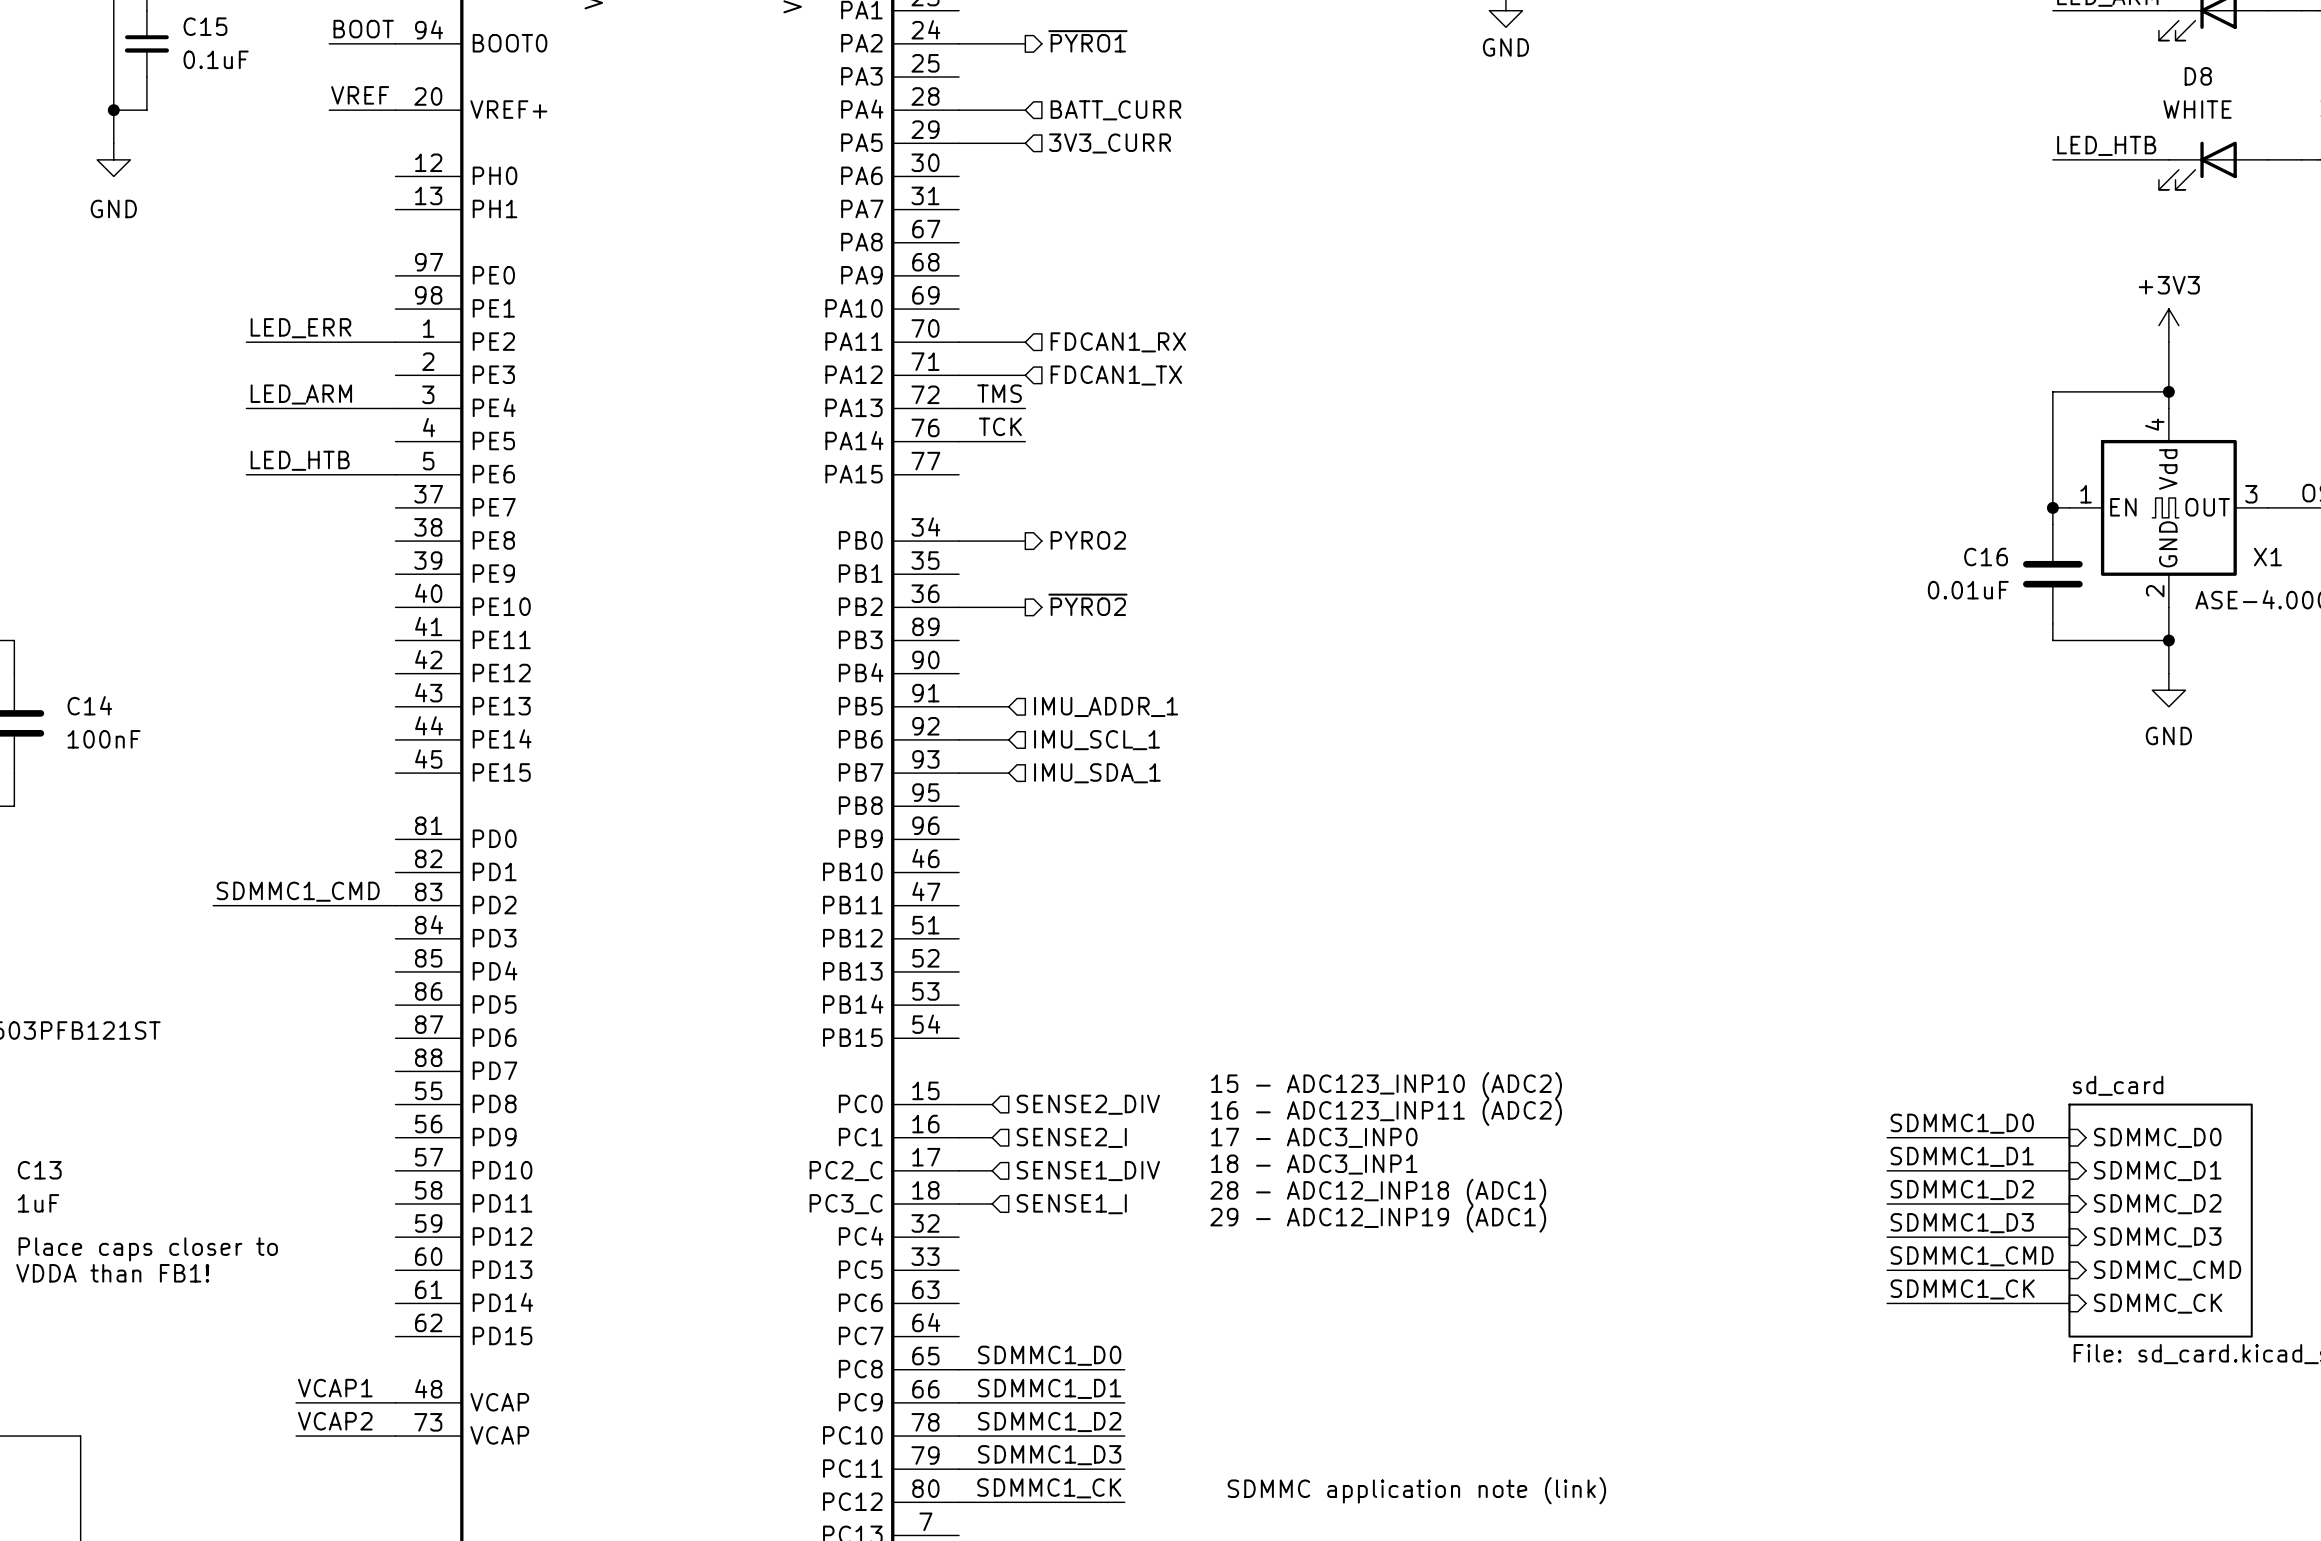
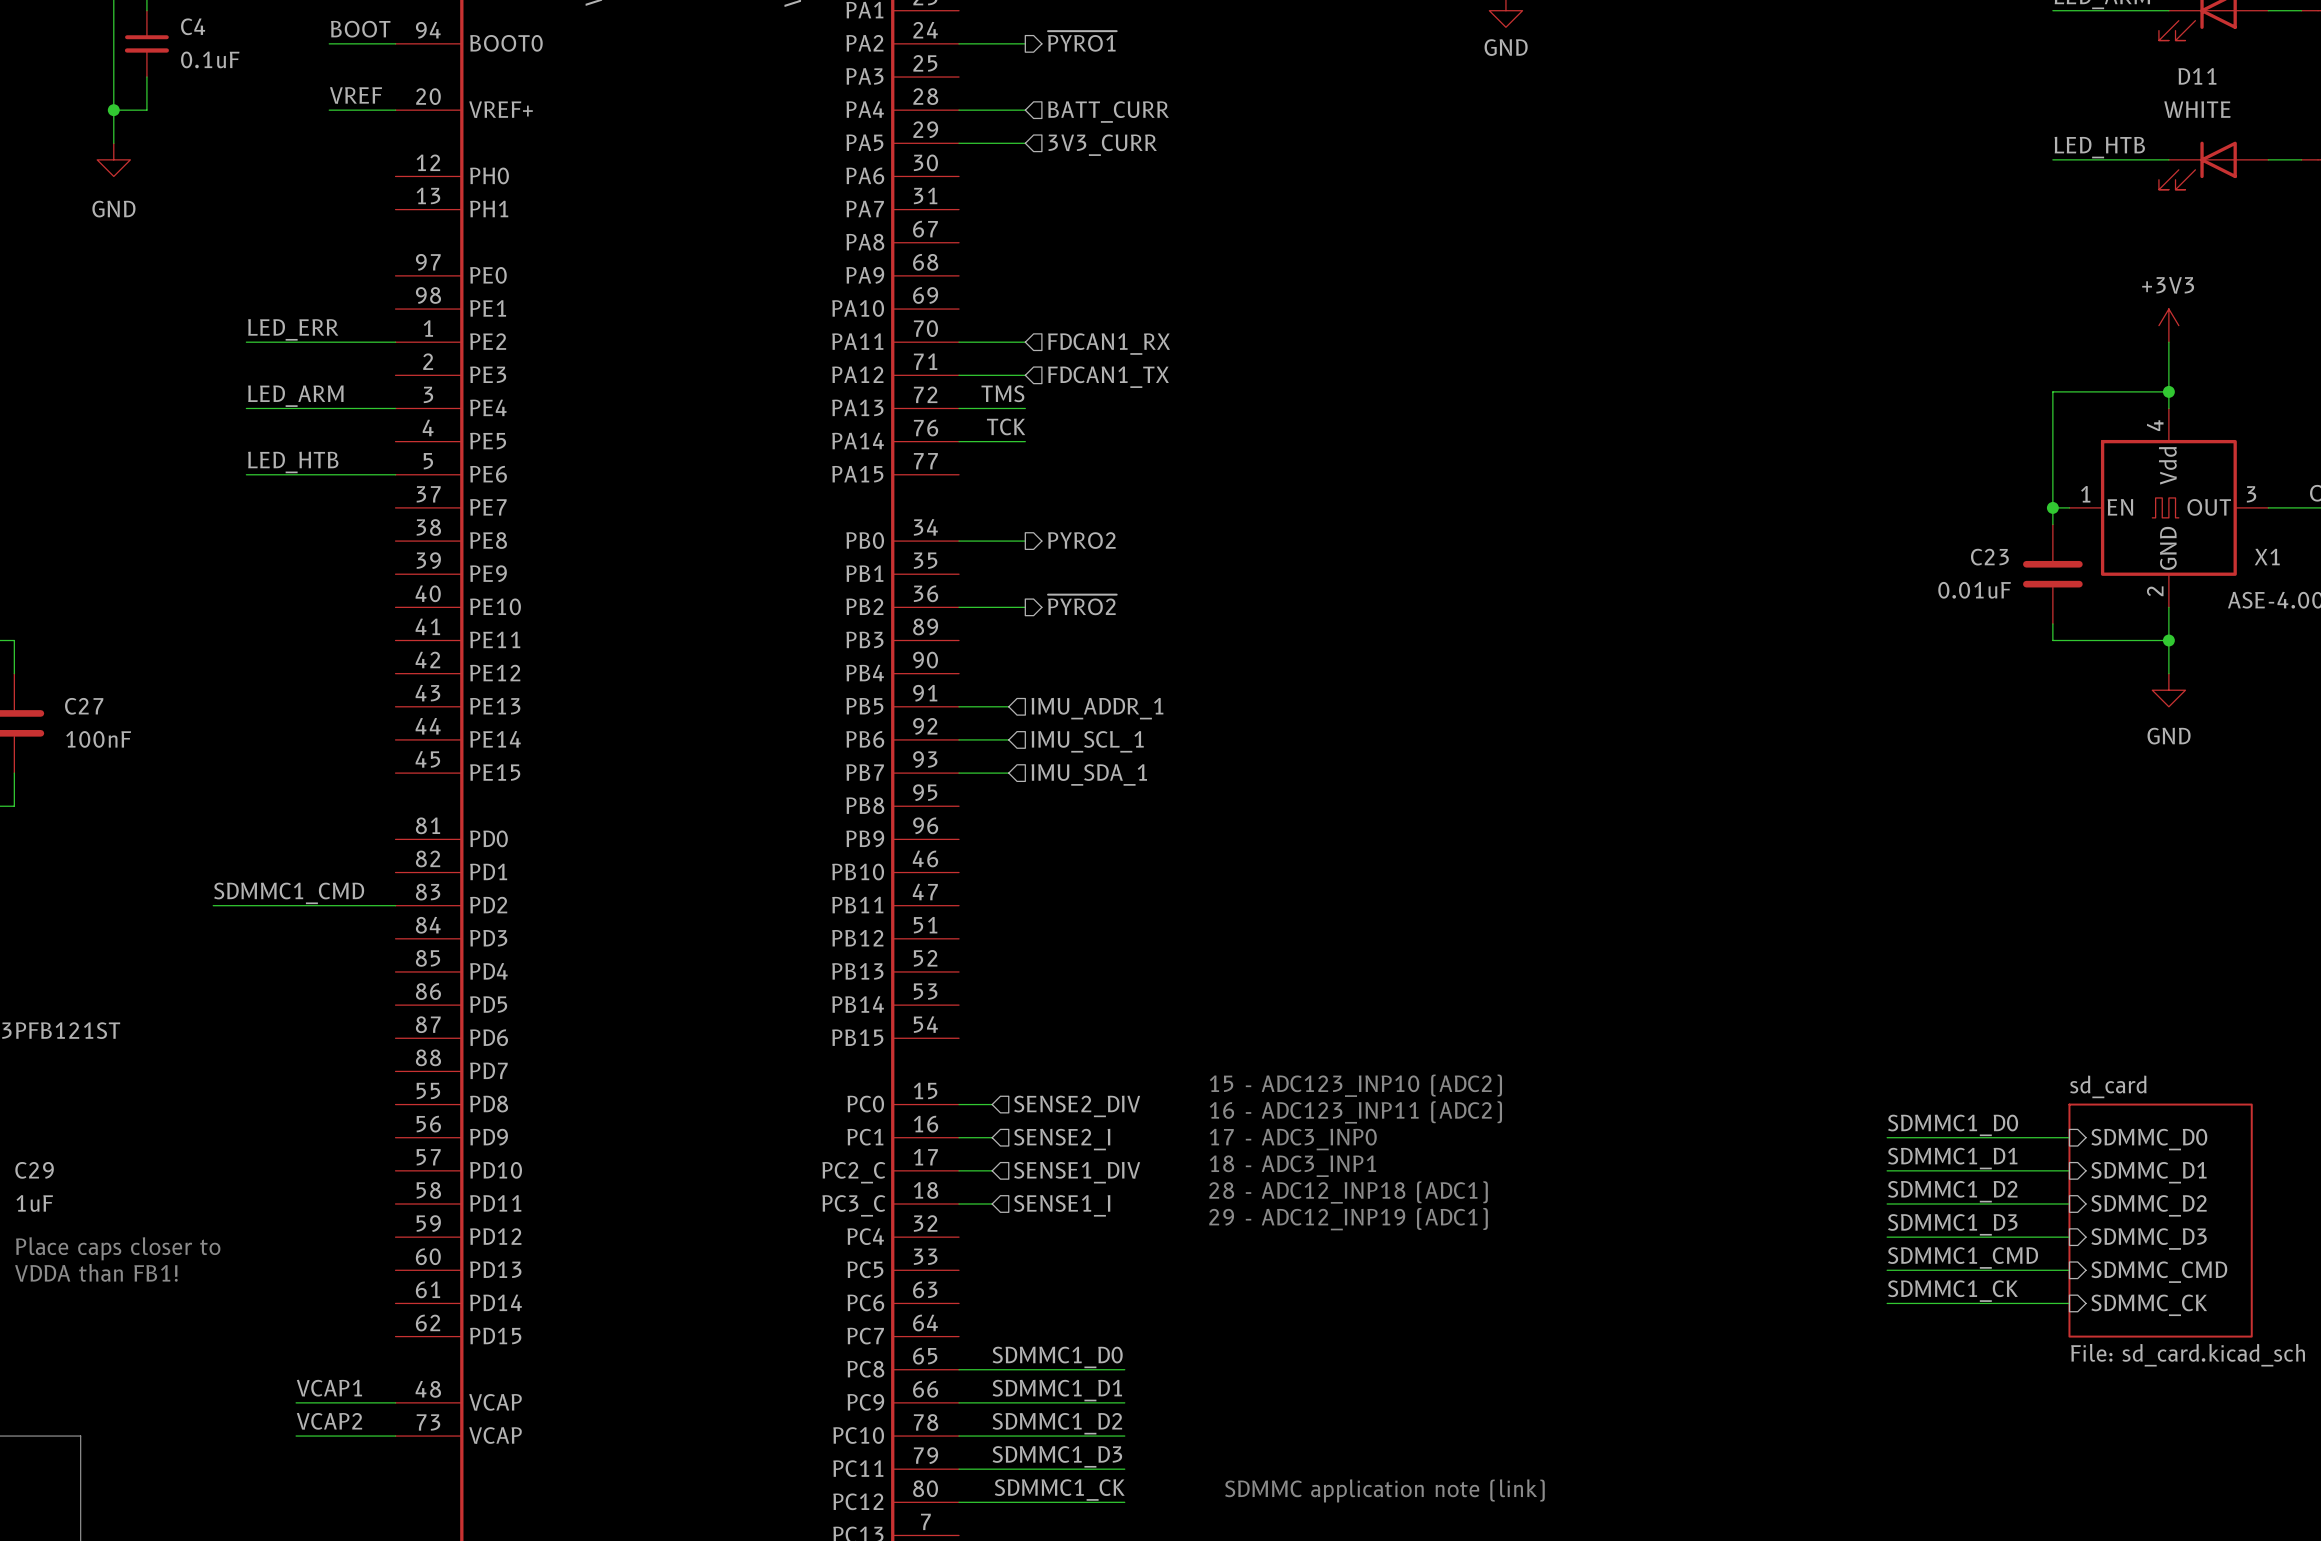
C15 name: C15 (205, 26) -> C4 (193, 26)
D8 name: D8 (2198, 76) -> D11 (2197, 76)
C16 name: C16 (1986, 557) -> C23 (1989, 557)
C14 name: C14 (89, 705) -> C27 (84, 706)
C13 name: C13 (39, 1170) -> C29 (34, 1170)

